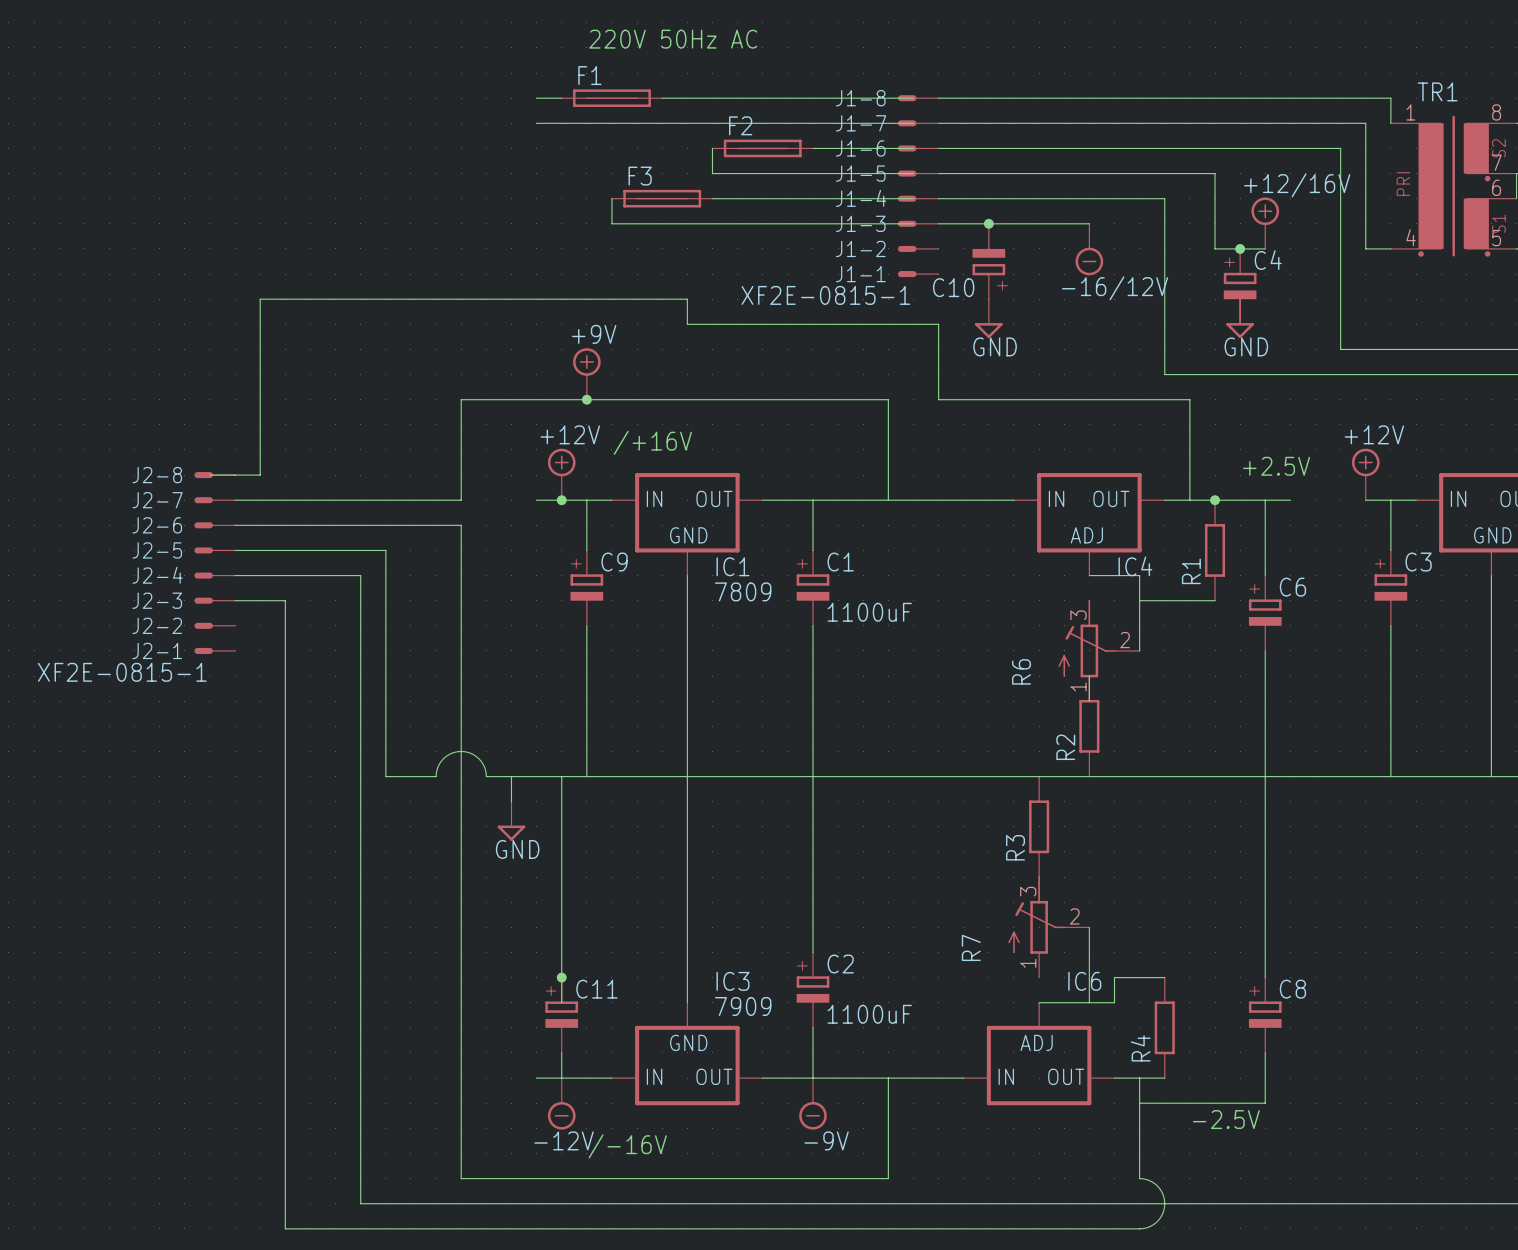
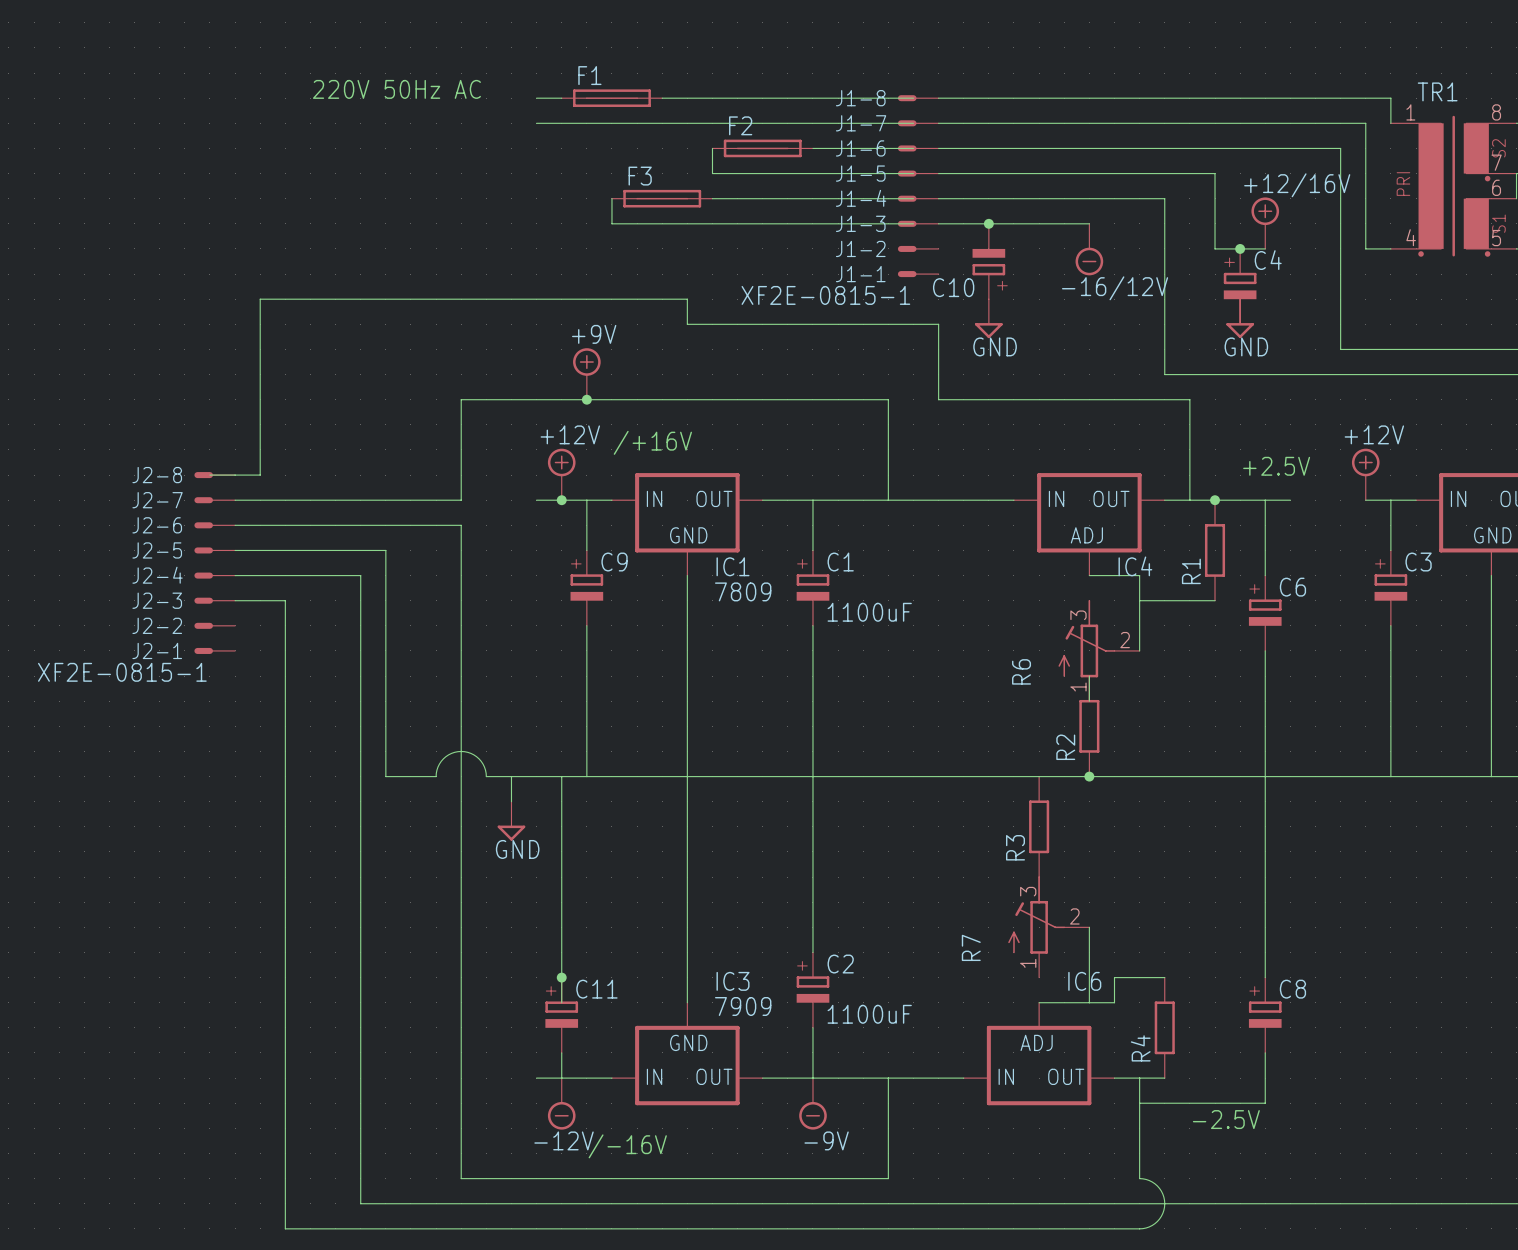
text: 220V 50Hz AC (673, 39) -> none
text: none -> 220V 50Hz AC (396, 89)
junction: none -> (1089, 776)

